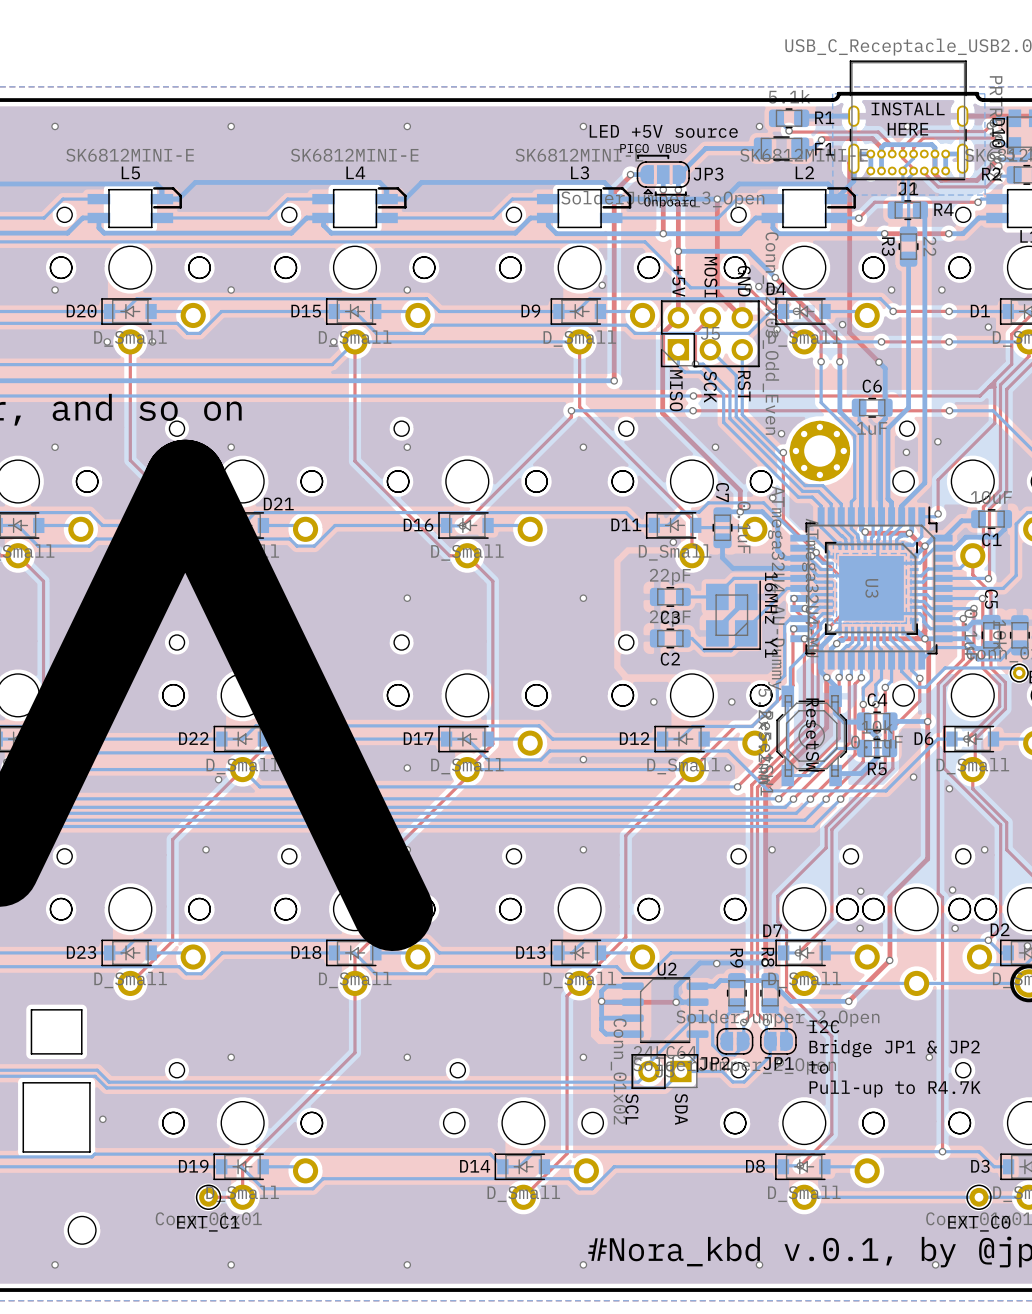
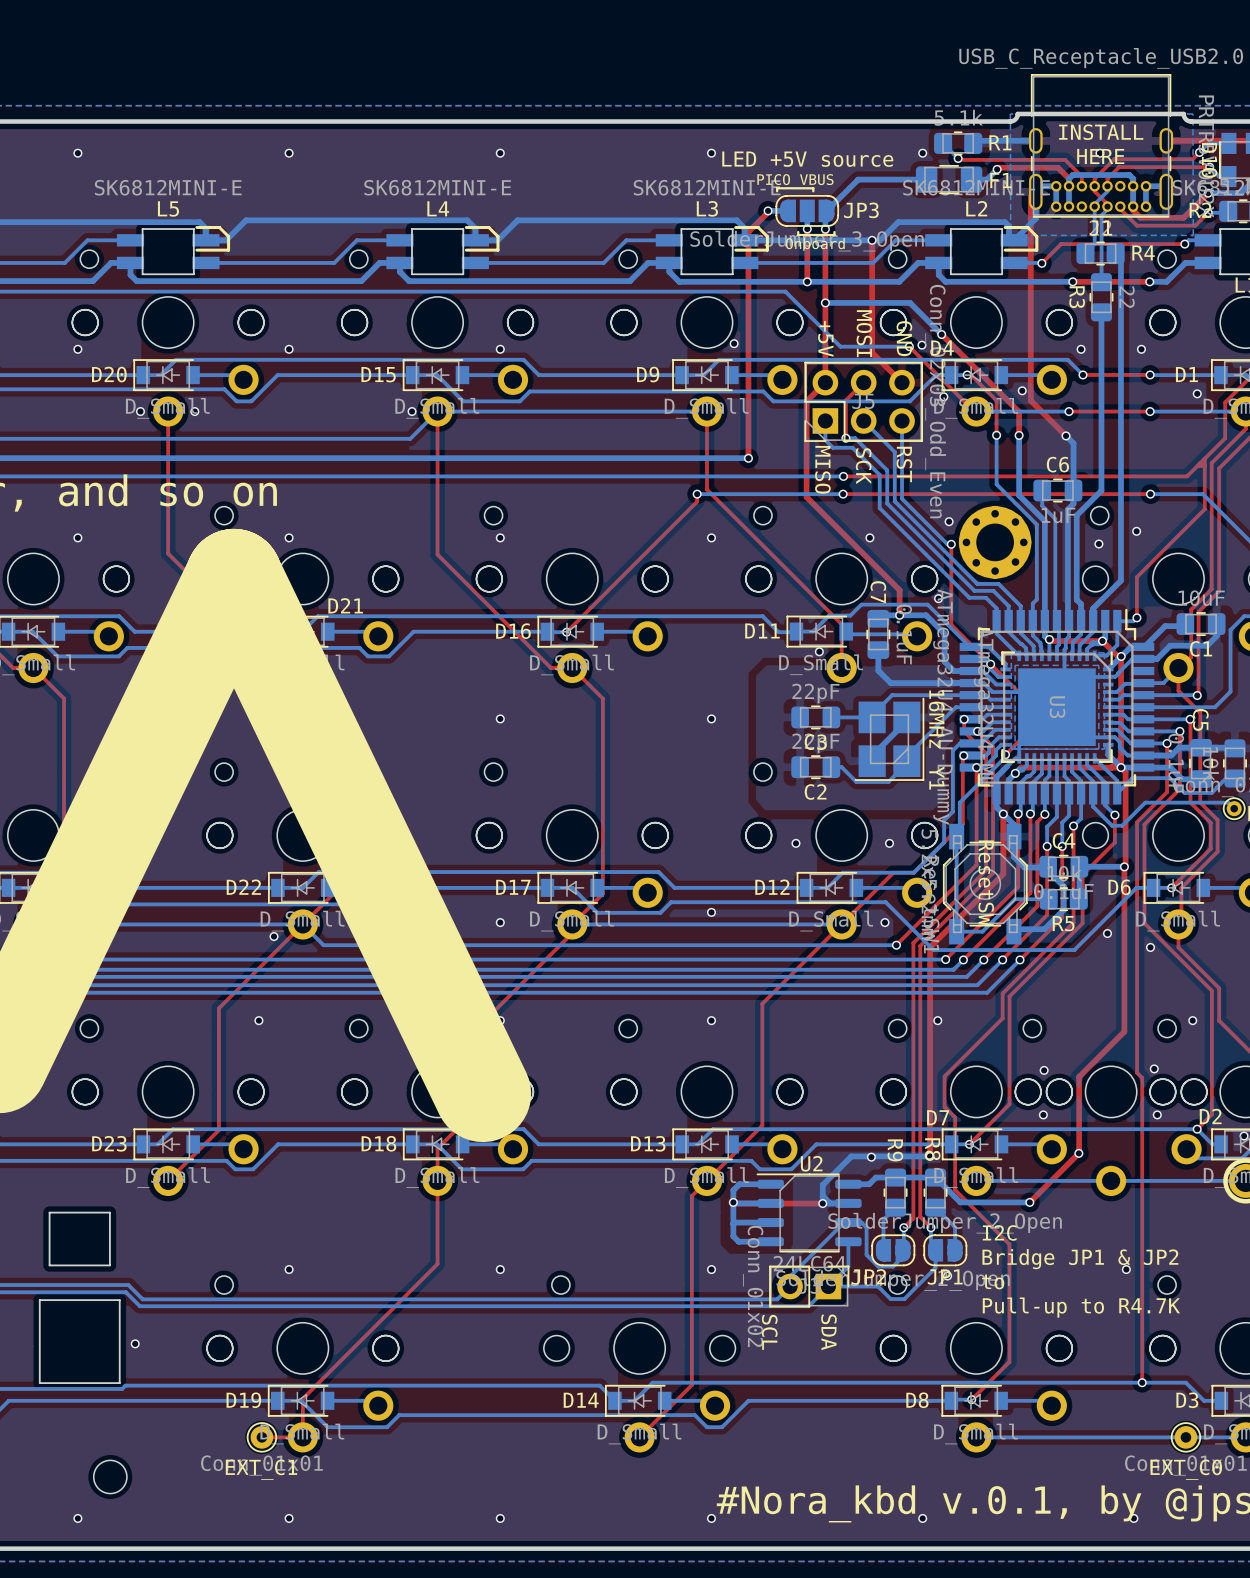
JP3 footprint: [636, 161, 690, 195] -> [775, 194, 840, 227]

